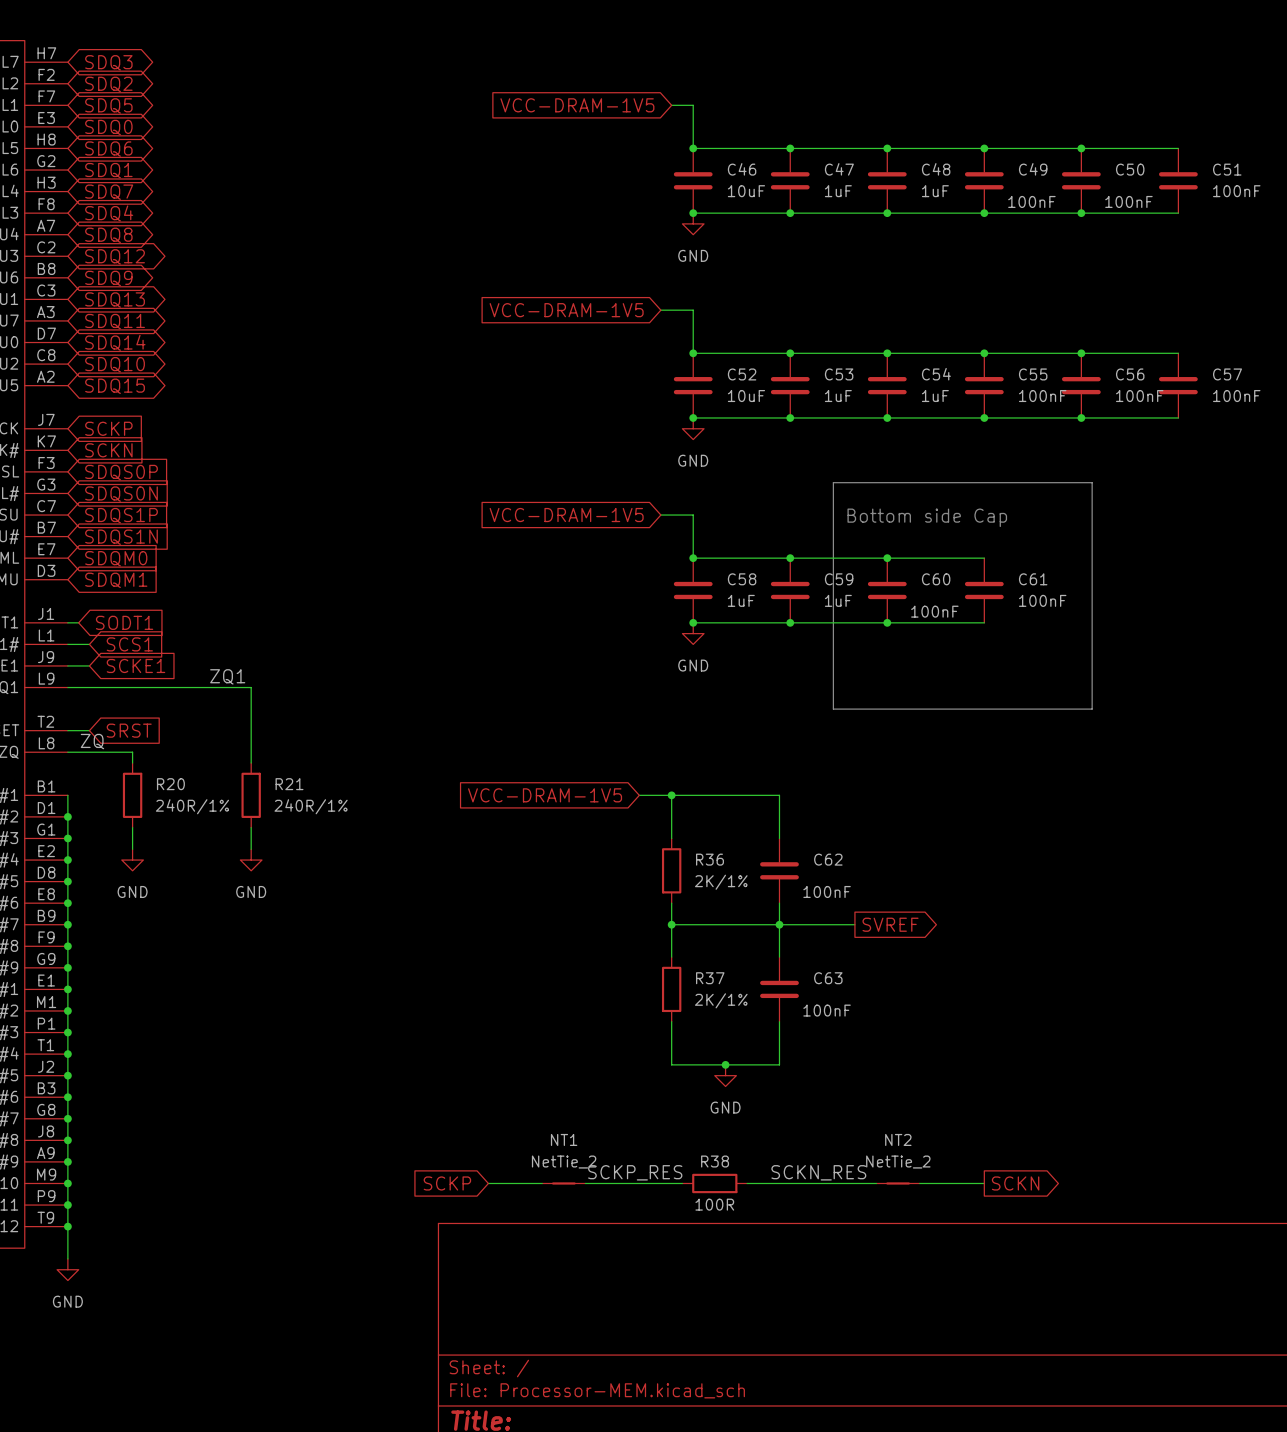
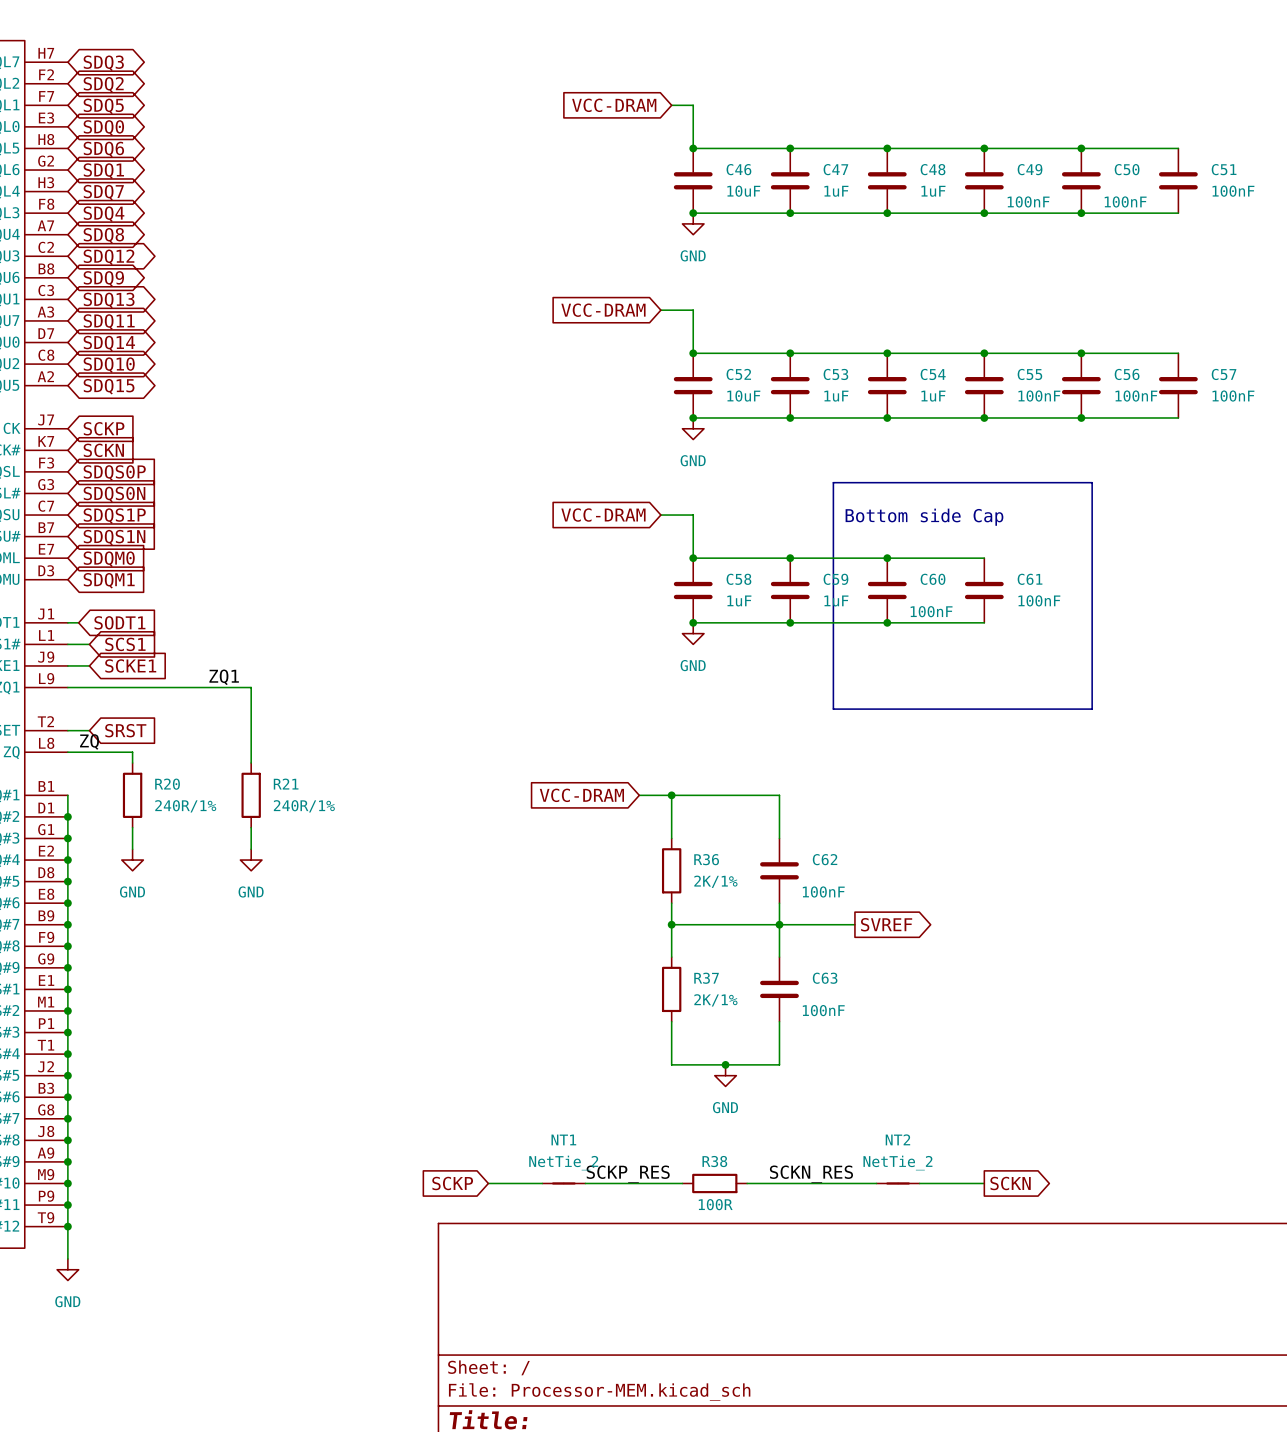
global label: VCC-DRAM-1V5 (577, 105) -> VCC-DRAM (614, 105)
global label: VCC-DRAM-1V5 (566, 310) -> VCC-DRAM (603, 310)
global label: VCC-DRAM-1V5 (566, 515) -> VCC-DRAM (603, 515)
global label: VCC-DRAM-1V5 (545, 795) -> VCC-DRAM (581, 795)

